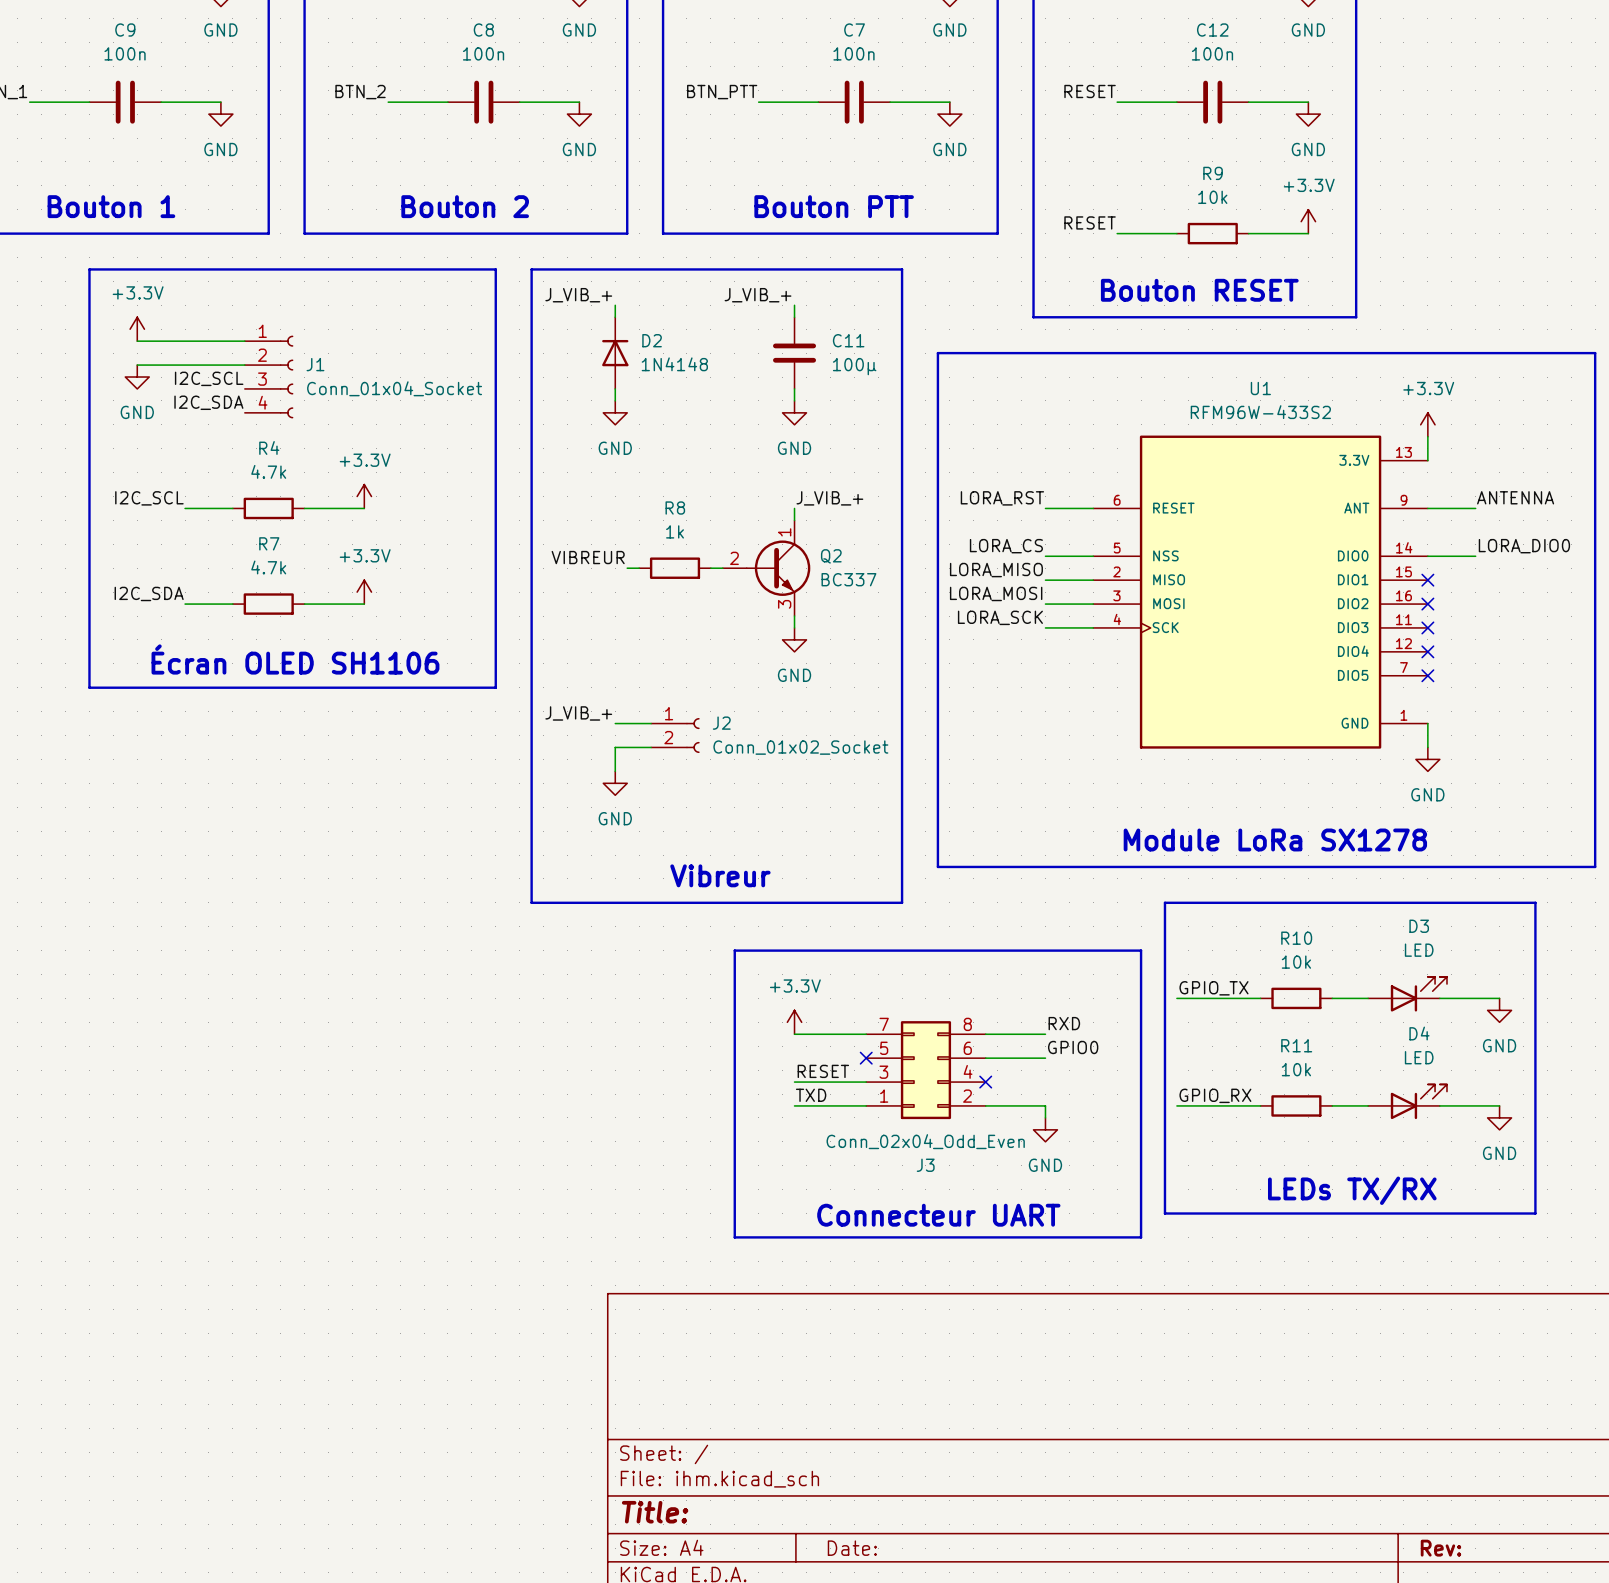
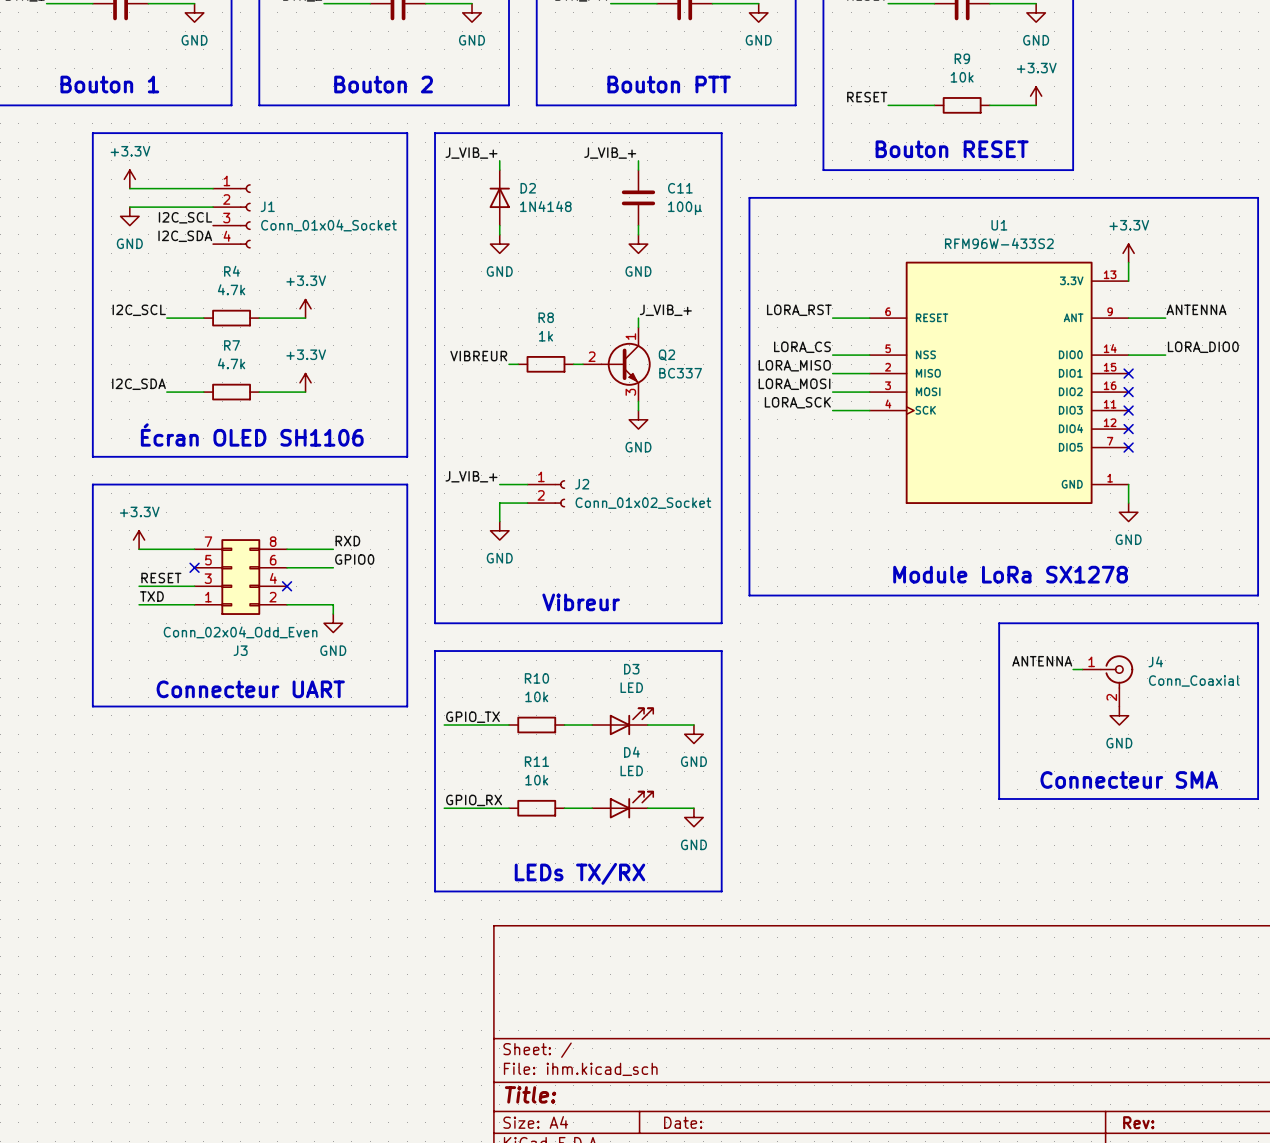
line: none -> (92, 484) (407, 484) (407, 706) (92, 706) (92, 484)
power symbol: none -> +3.3V (139, 540)
label: none -> RXD (347, 541)
wire: none -> (139, 549) (194, 549)
wire: none -> (287, 549) (333, 549)
label: none -> GPIO0 (354, 559)
no-connect mark: none -> (194, 567)
wire: none -> (287, 567) (333, 567)
label: none -> RESET (161, 578)
wire: none -> (139, 586) (194, 586)
no-connect mark: none -> (287, 586)
label: none -> TXD (151, 596)
wire: none -> (139, 604) (194, 604)
wire: none -> (287, 604) (333, 604) (333, 614)
power symbol: none -> GND (333, 623)
line: (1260, 902) (1164, 902) (1164, 1213) (1535, 1213) (1535, 902) -> (999, 623) (999, 798) (1258, 798) (1258, 623) (1211, 623)
line: none -> (435, 651) (721, 651) (721, 891) (435, 891) (435, 651)
line: (734, 950) (1141, 950) (1141, 1237) (734, 1237) (734, 950) -> none
label: none -> ANTENNA (1042, 661)
wire: none -> (1073, 669) (1082, 669)
J4: none -> Conn_Coaxial (1107, 680)
text: none -> Connecteur UART (250, 689)
label: GPIO_TX (1213, 988) -> none
D3 position: (1407, 994) -> (622, 721)
wire: (1176, 998) (1260, 998) -> none
R10 position: (1296, 998) -> (536, 725)
wire: (1332, 998) (1368, 998) -> none
wire: (1439, 998) (1499, 998) -> none
power symbol: GND (1499, 1010) -> none
power symbol: +3.3V (794, 1022) -> none
power symbol: none -> GND (1119, 715)
label: RXD (1064, 1023) -> none
label: none -> GPIO_TX (472, 717)
wire: none -> (444, 725) (508, 725)
wire: none -> (564, 725) (592, 725)
wire: (985, 1034) (1045, 1034) -> none
power symbol: none -> GND (693, 734)
label: GPIO0 (1073, 1047) -> none
no-connect mark: (866, 1058) -> none
wire: (985, 1058) (1045, 1058) -> (647, 808) (693, 808)
J3 position: (925, 1070) -> (240, 577)
label: RESET (823, 1071) -> none
wire: (794, 1082) (866, 1082) -> none
no-connect mark: (985, 1082) -> none
label: TXD (811, 1095) -> none
label: GPIO_RX (1215, 1095) -> none
D4 position: (1407, 1101) -> (622, 805)
wire: (794, 1105) (866, 1105) -> none
wire: (985, 1105) (1045, 1105) (1045, 1117) -> none
wire: (1176, 1105) (1260, 1105) -> none
R11 position: (1296, 1105) -> (536, 808)
wire: (1332, 1105) (1368, 1105) -> none
text: none -> Connecteur SMA (1129, 779)
wire: (1439, 1105) (1499, 1105) -> none
power symbol: GND (1499, 1117) -> none
power symbol: GND (1045, 1129) -> none
label: none -> GPIO_RX (474, 800)
wire: none -> (444, 808) (508, 808)
wire: none -> (564, 808) (592, 808)
power symbol: none -> GND (693, 817)
text: LEDs TX/RX (1352, 1190) -> none
text: Connecteur UART (938, 1215) -> none
text: none -> LEDs TX/RX (579, 873)

